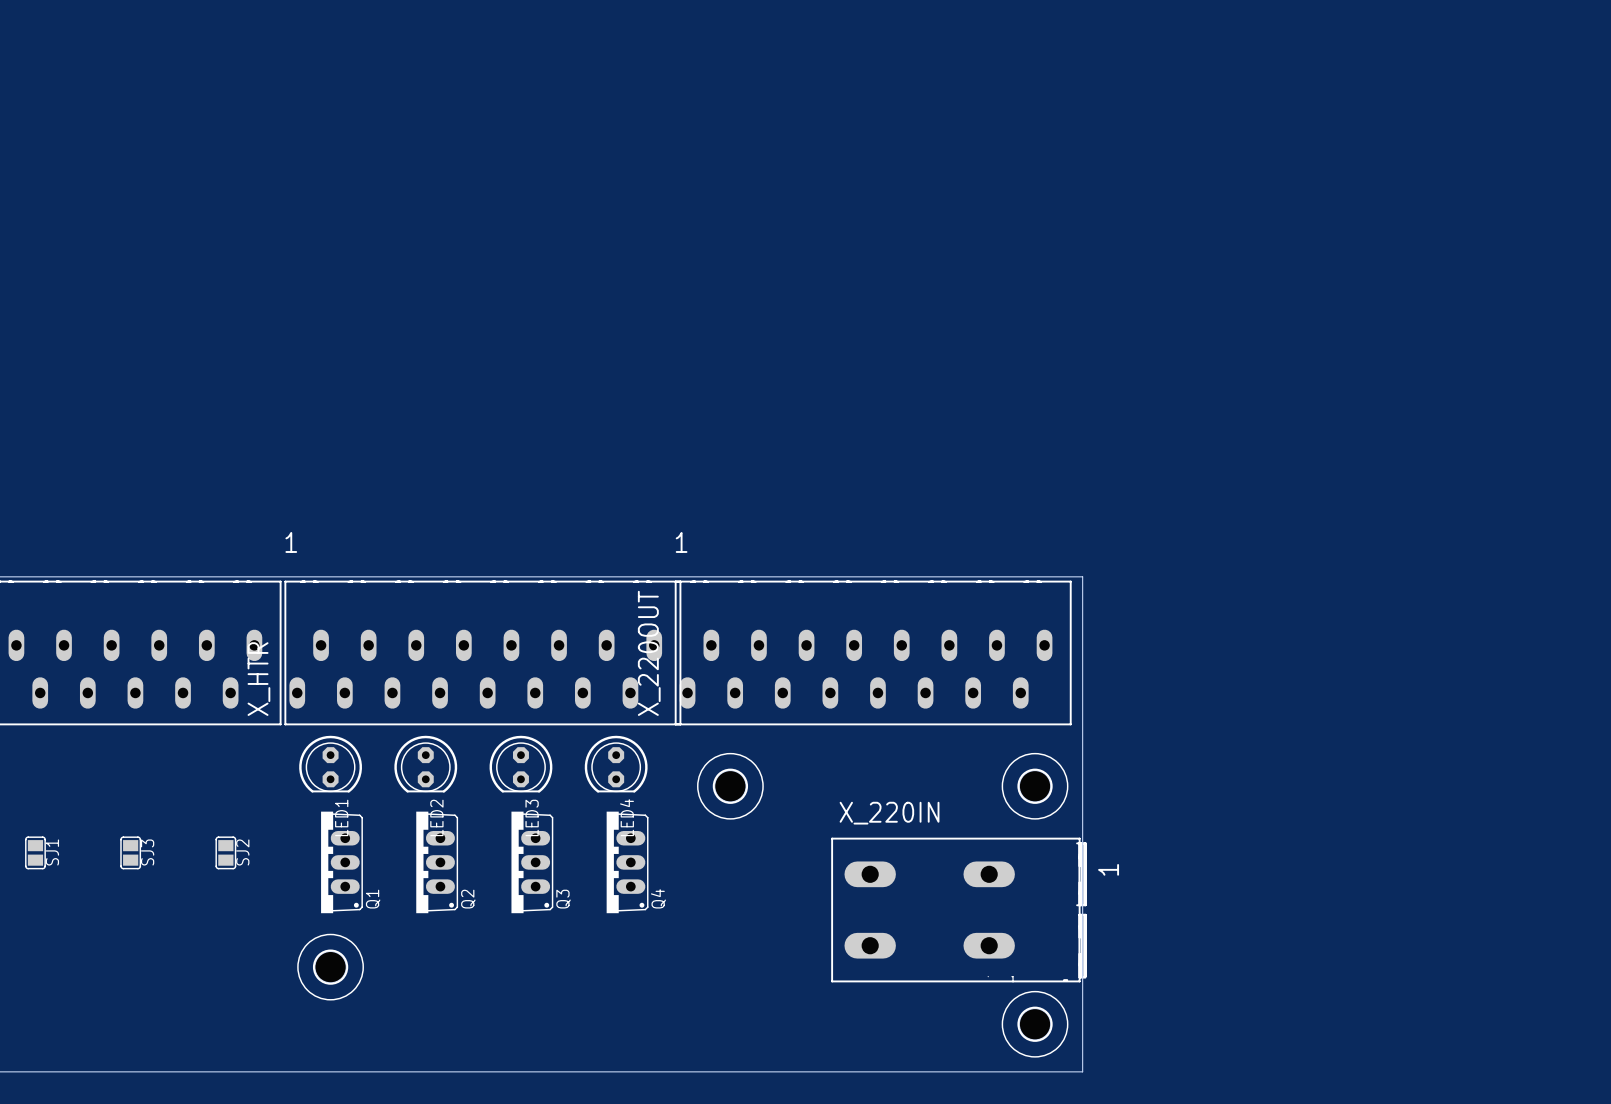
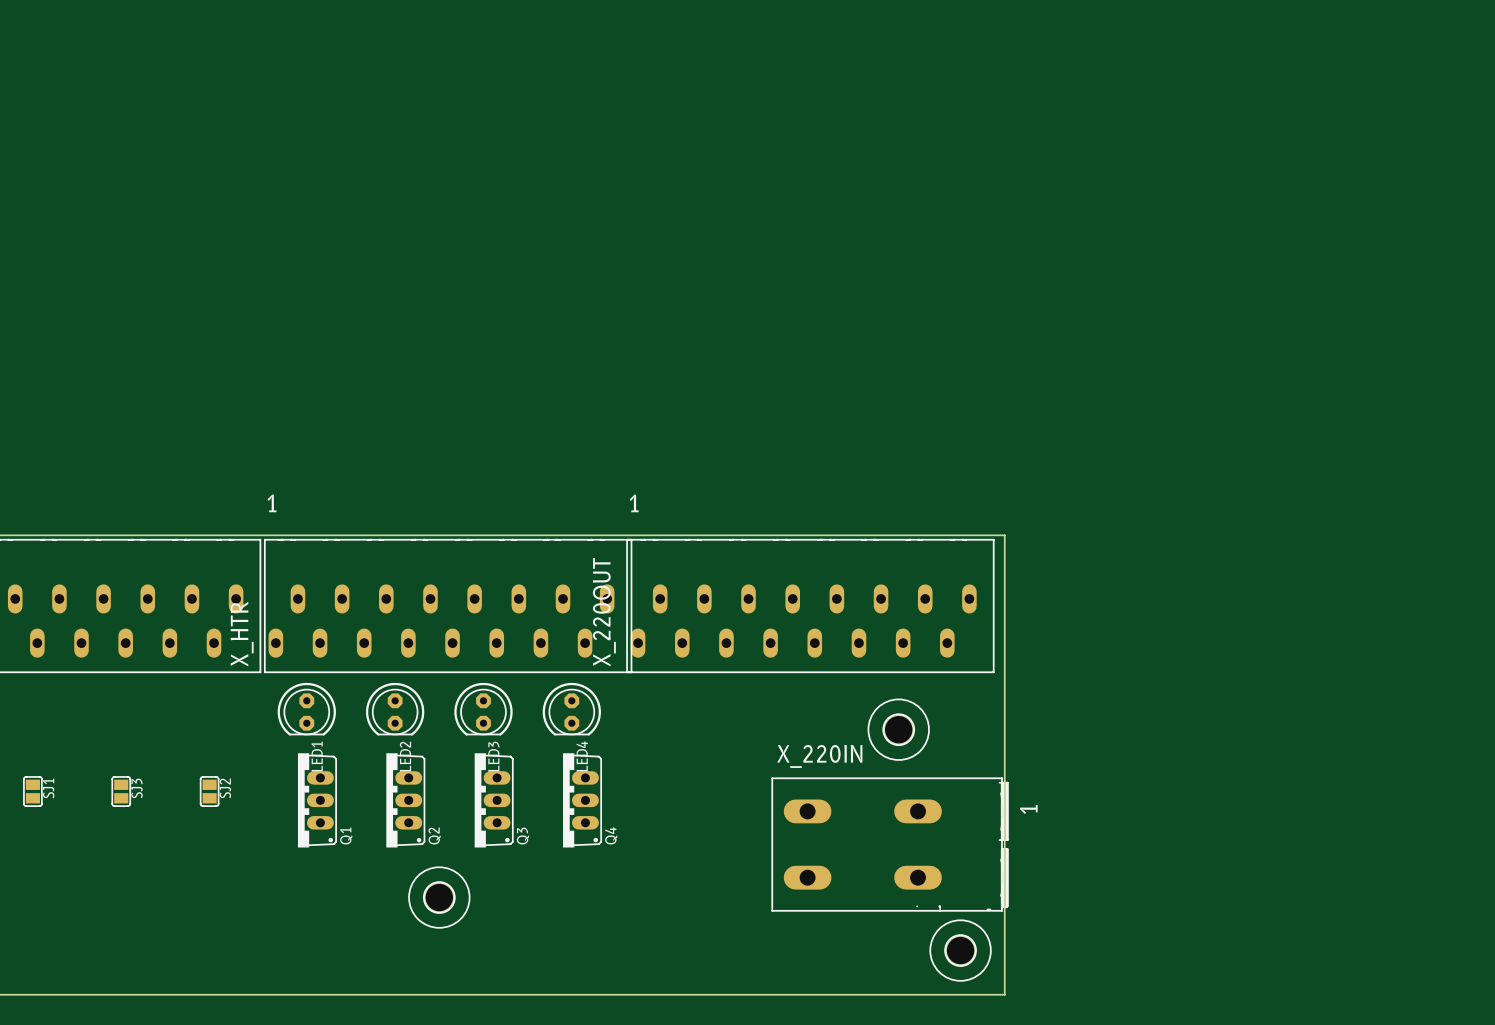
part: (730, 786) -> none
part position: (1035, 786) -> (898, 729)
part position: (330, 967) -> (439, 897)

